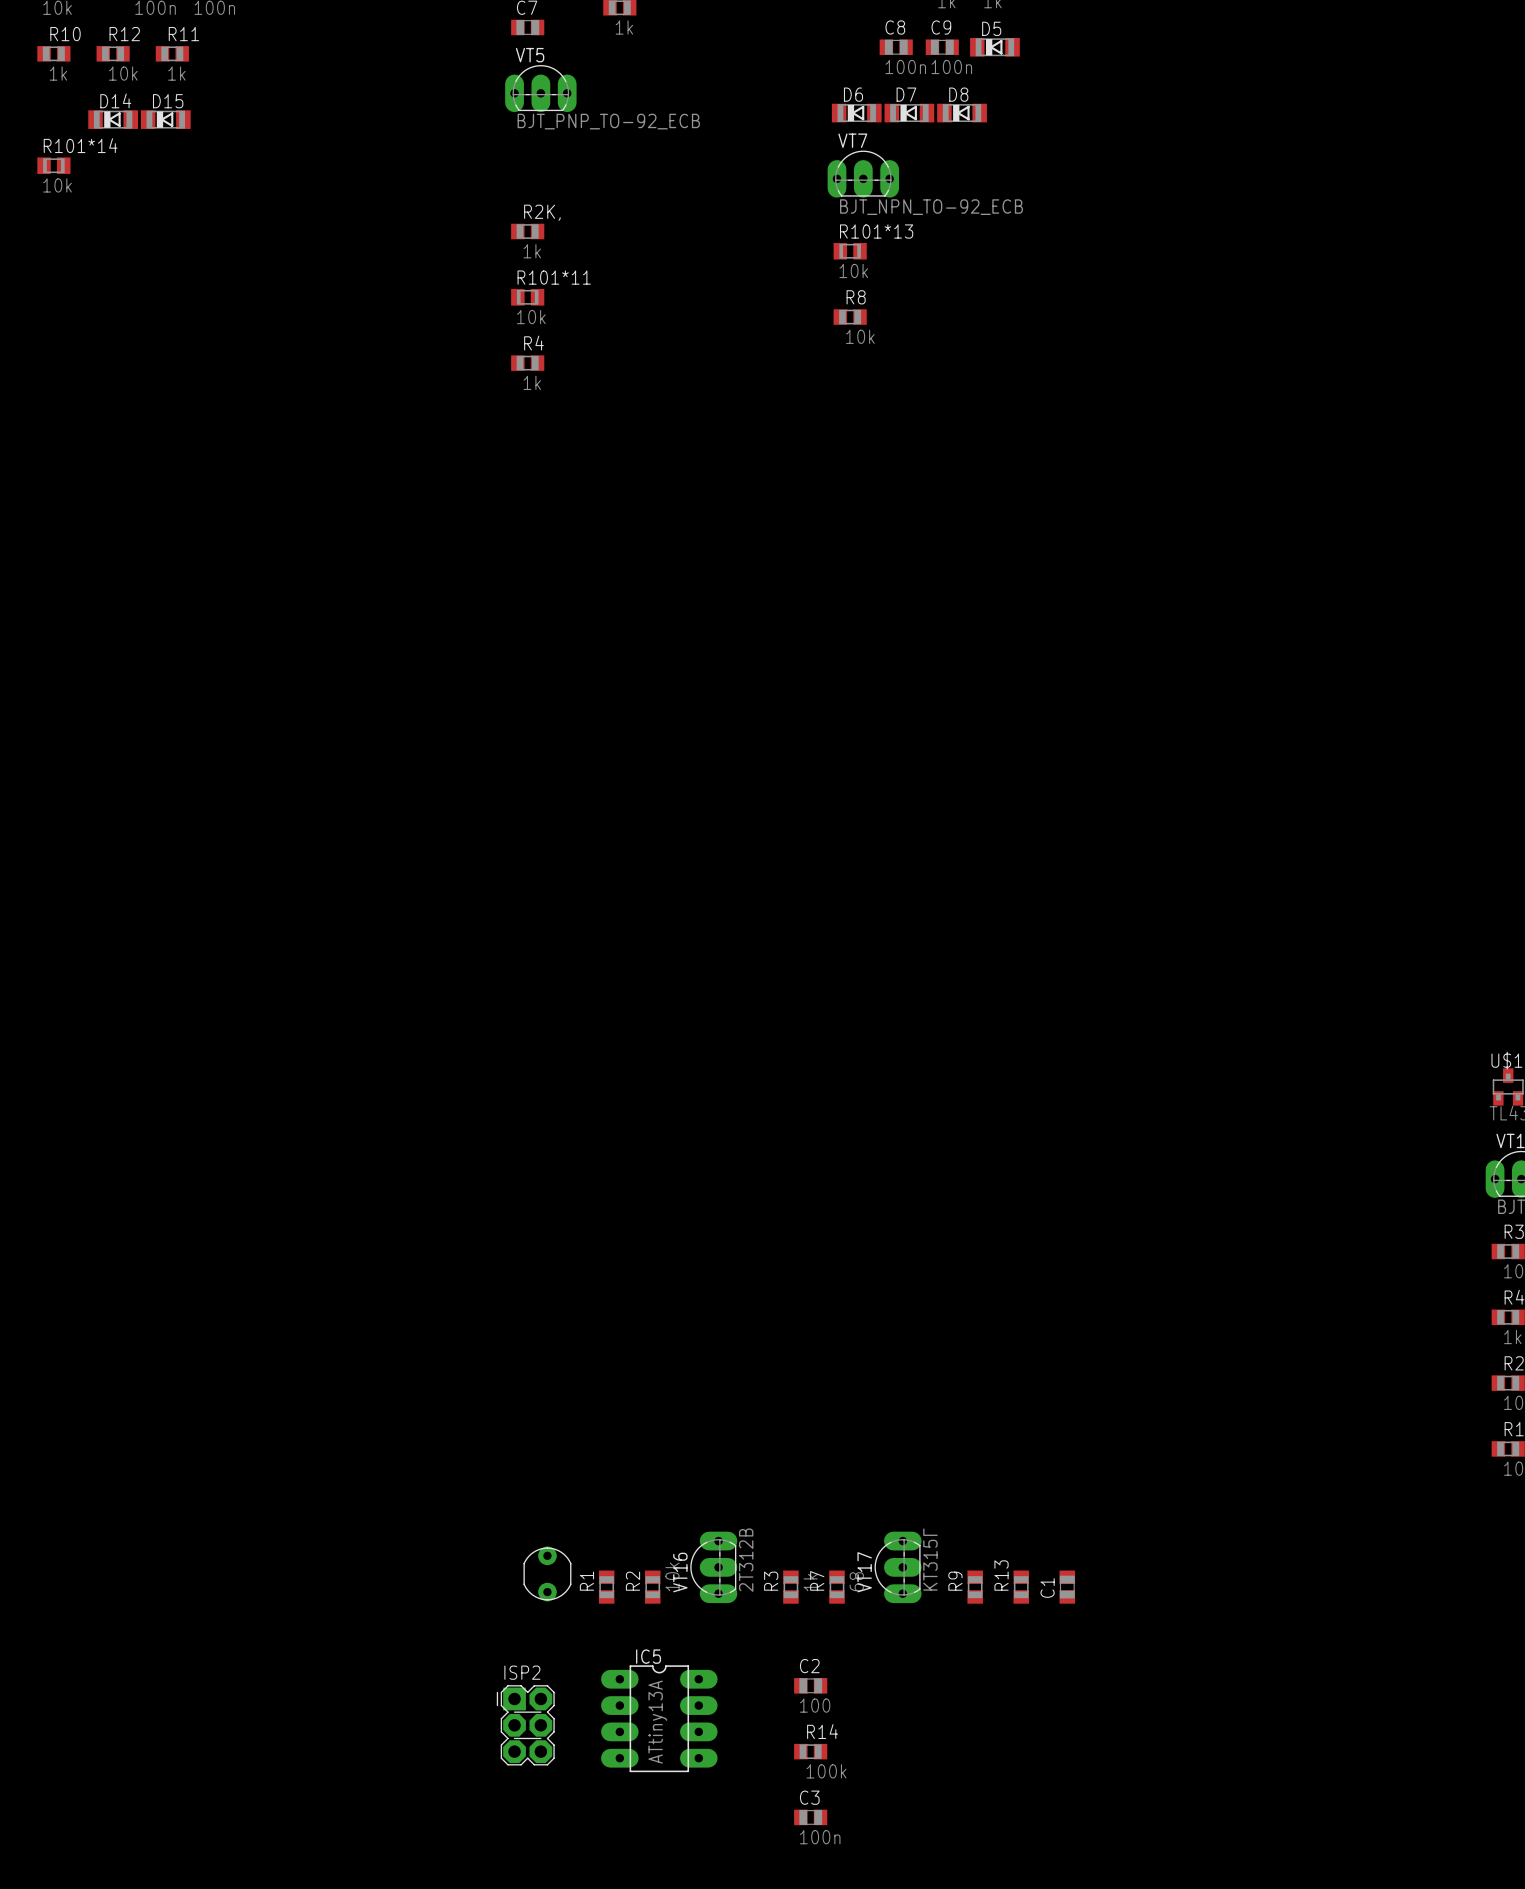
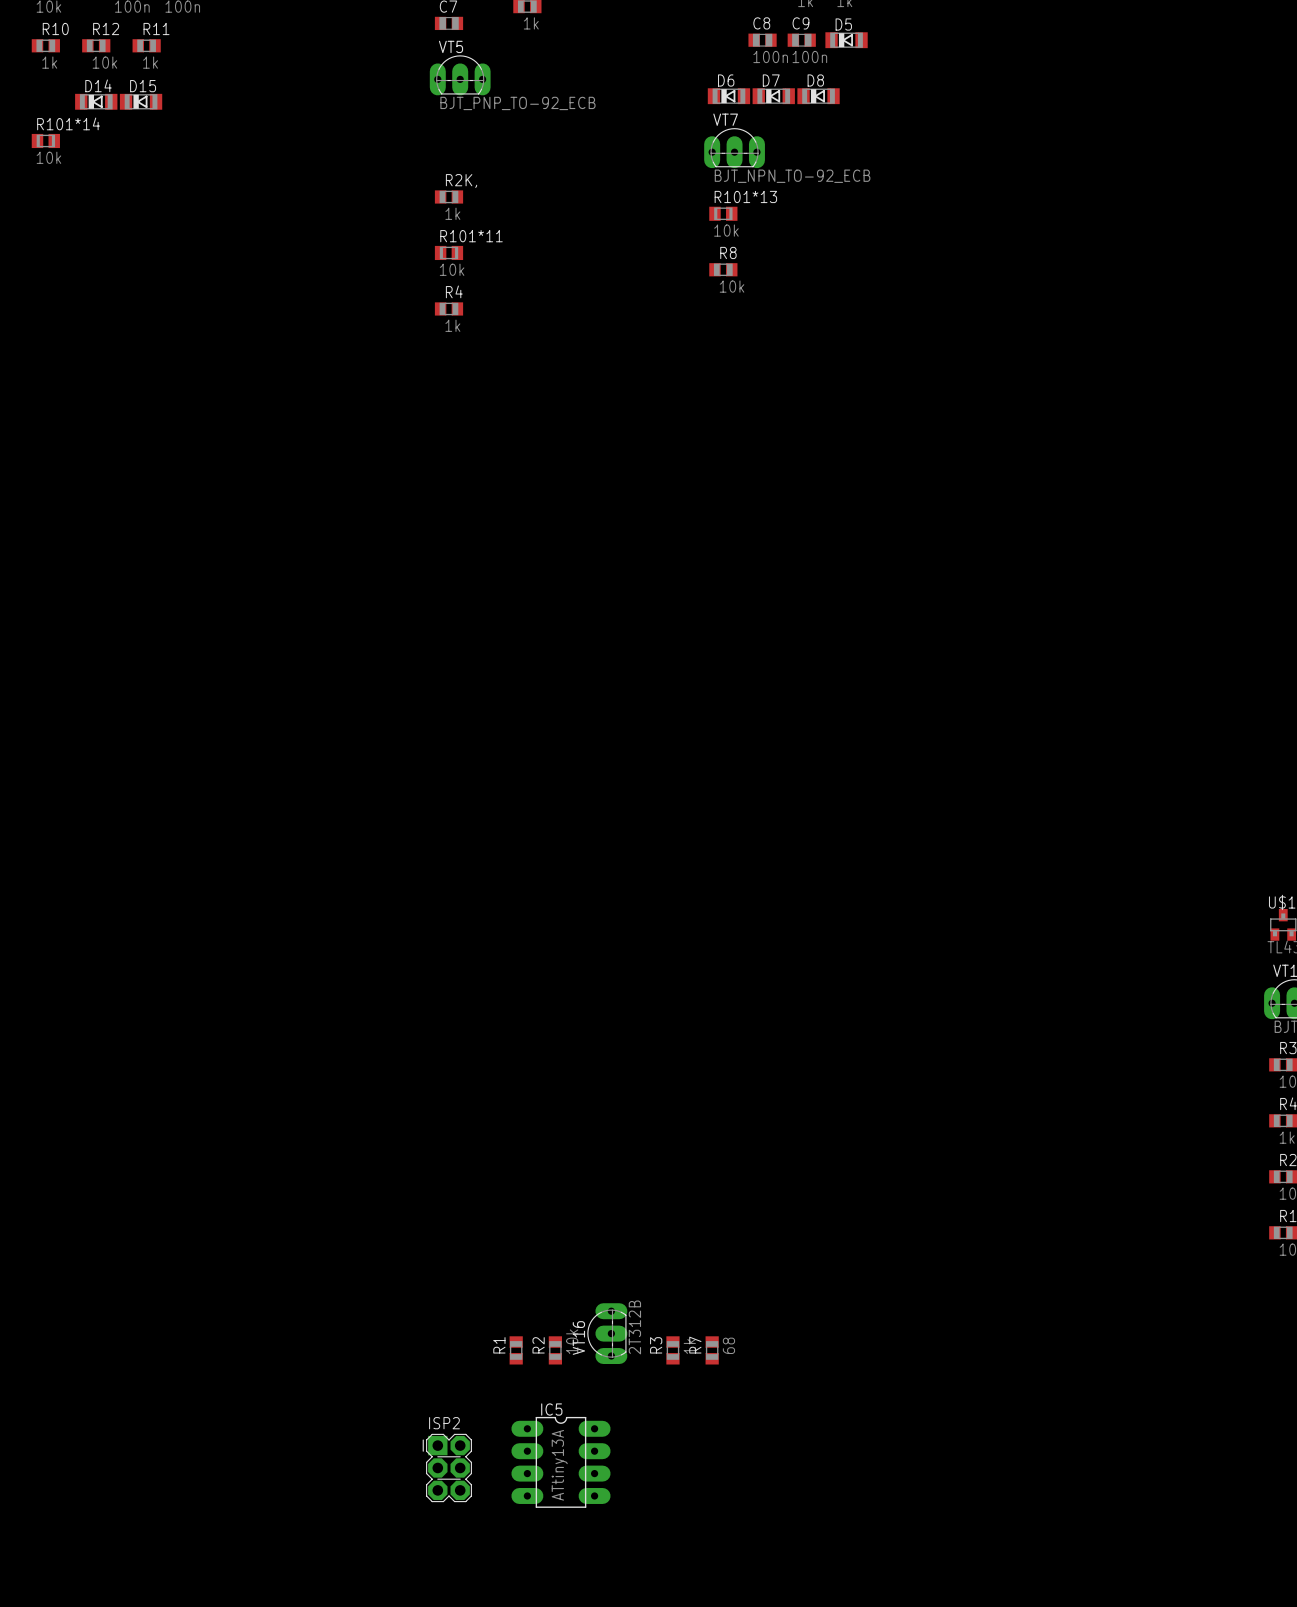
VT17: КТ315Г (898, 1567) -> none
part: (547, 1573) -> none
R9: (975, 1587) -> none
R13: (1021, 1587) -> none
C1: (1067, 1587) -> none
C2: 100 (810, 1685) -> none
R14: 100k (810, 1751) -> none
C3: 100n (810, 1817) -> none

